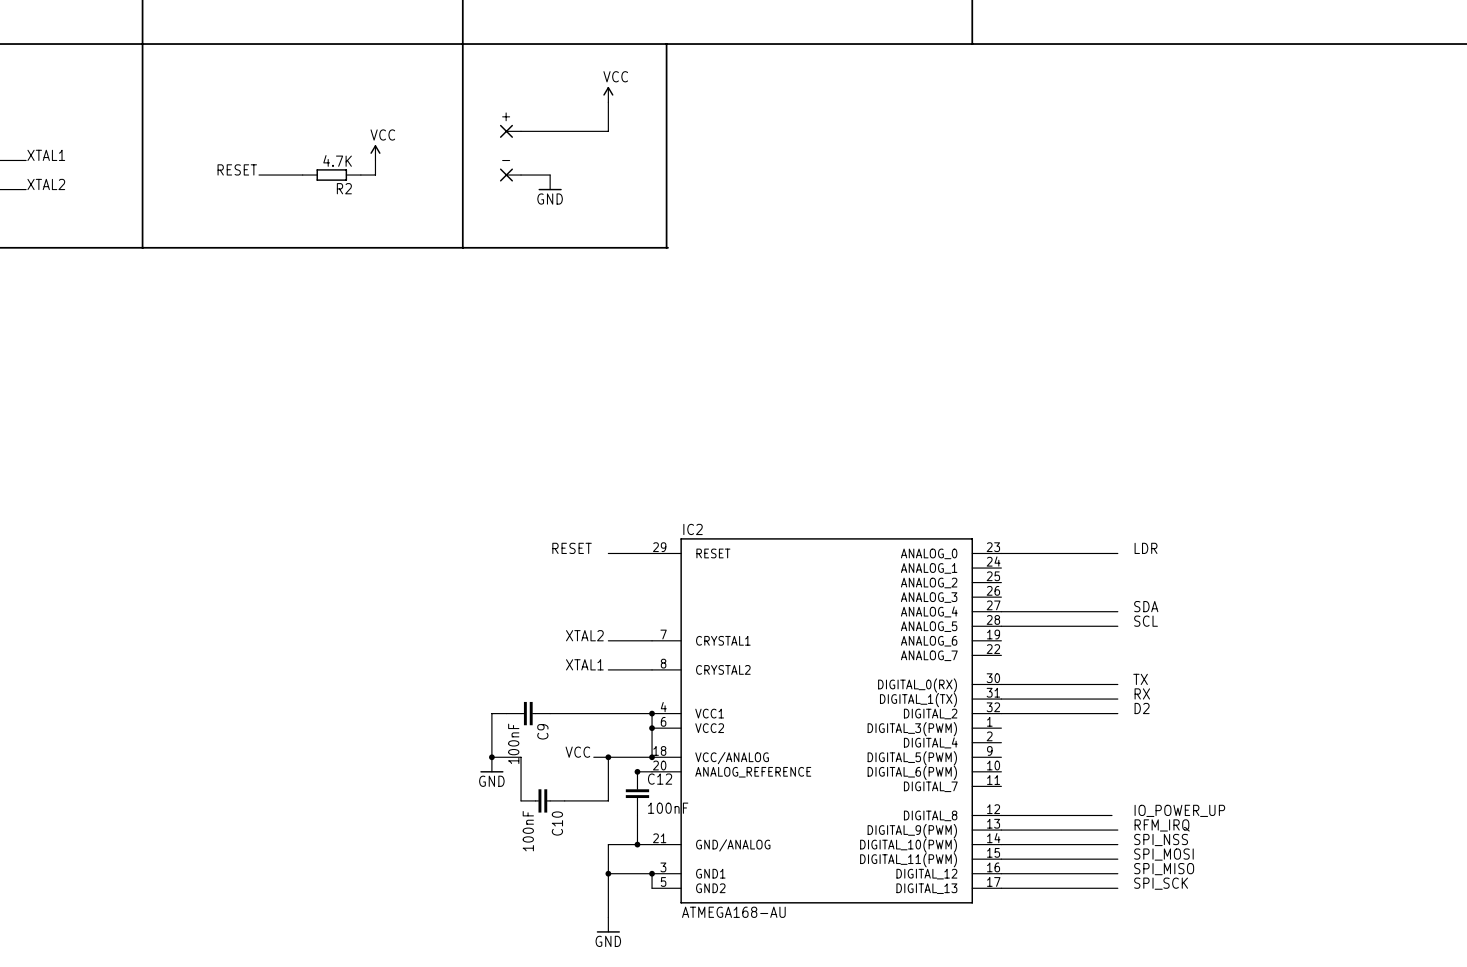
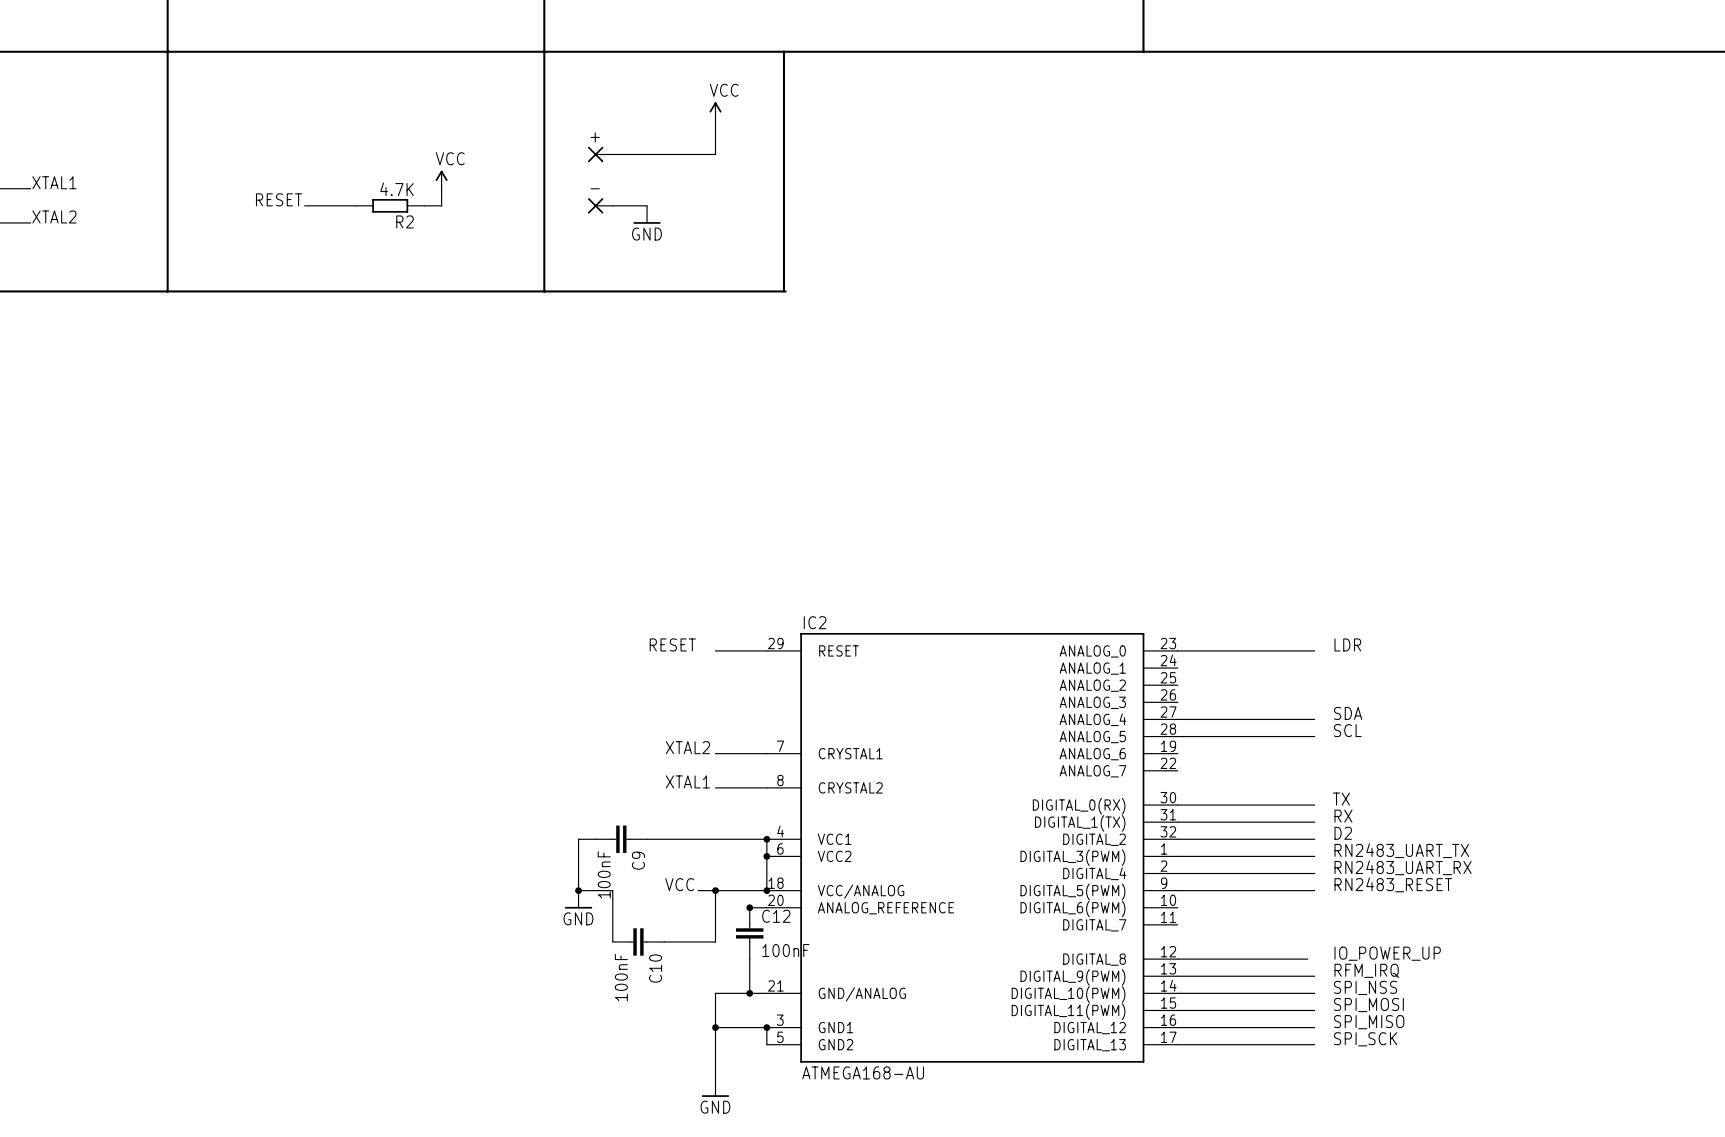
label: none -> RN2483_UART_TX (1401, 850)
wire: none -> (1177, 856) (1314, 856)
label: none -> RN2483_UART_RX (1403, 867)
wire: none -> (1177, 873) (1314, 873)
label: none -> RN2483_RESET (1393, 884)
wire: none -> (1177, 890) (1314, 890)

